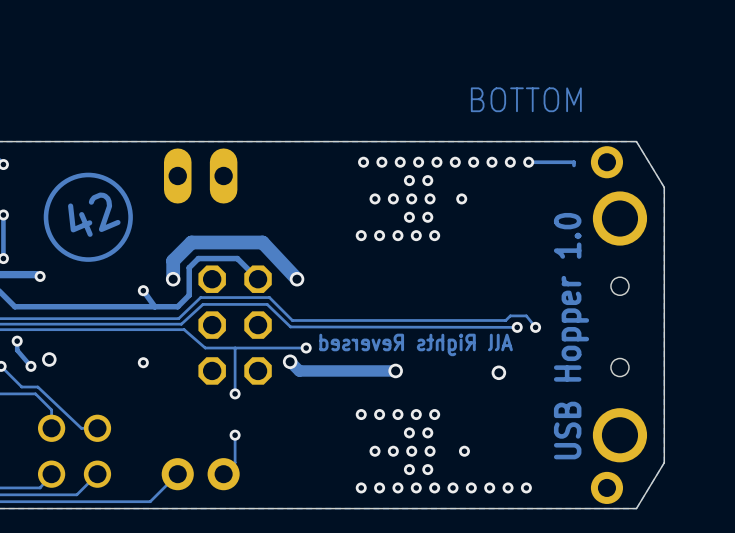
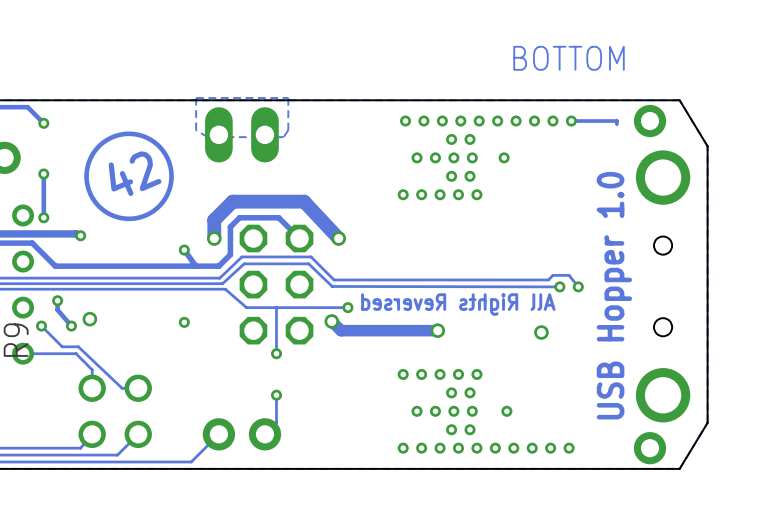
zone outline: none -> (288, 97) (288, 130) (283, 137) (207, 137) (196, 130) (196, 97) (288, 97)

